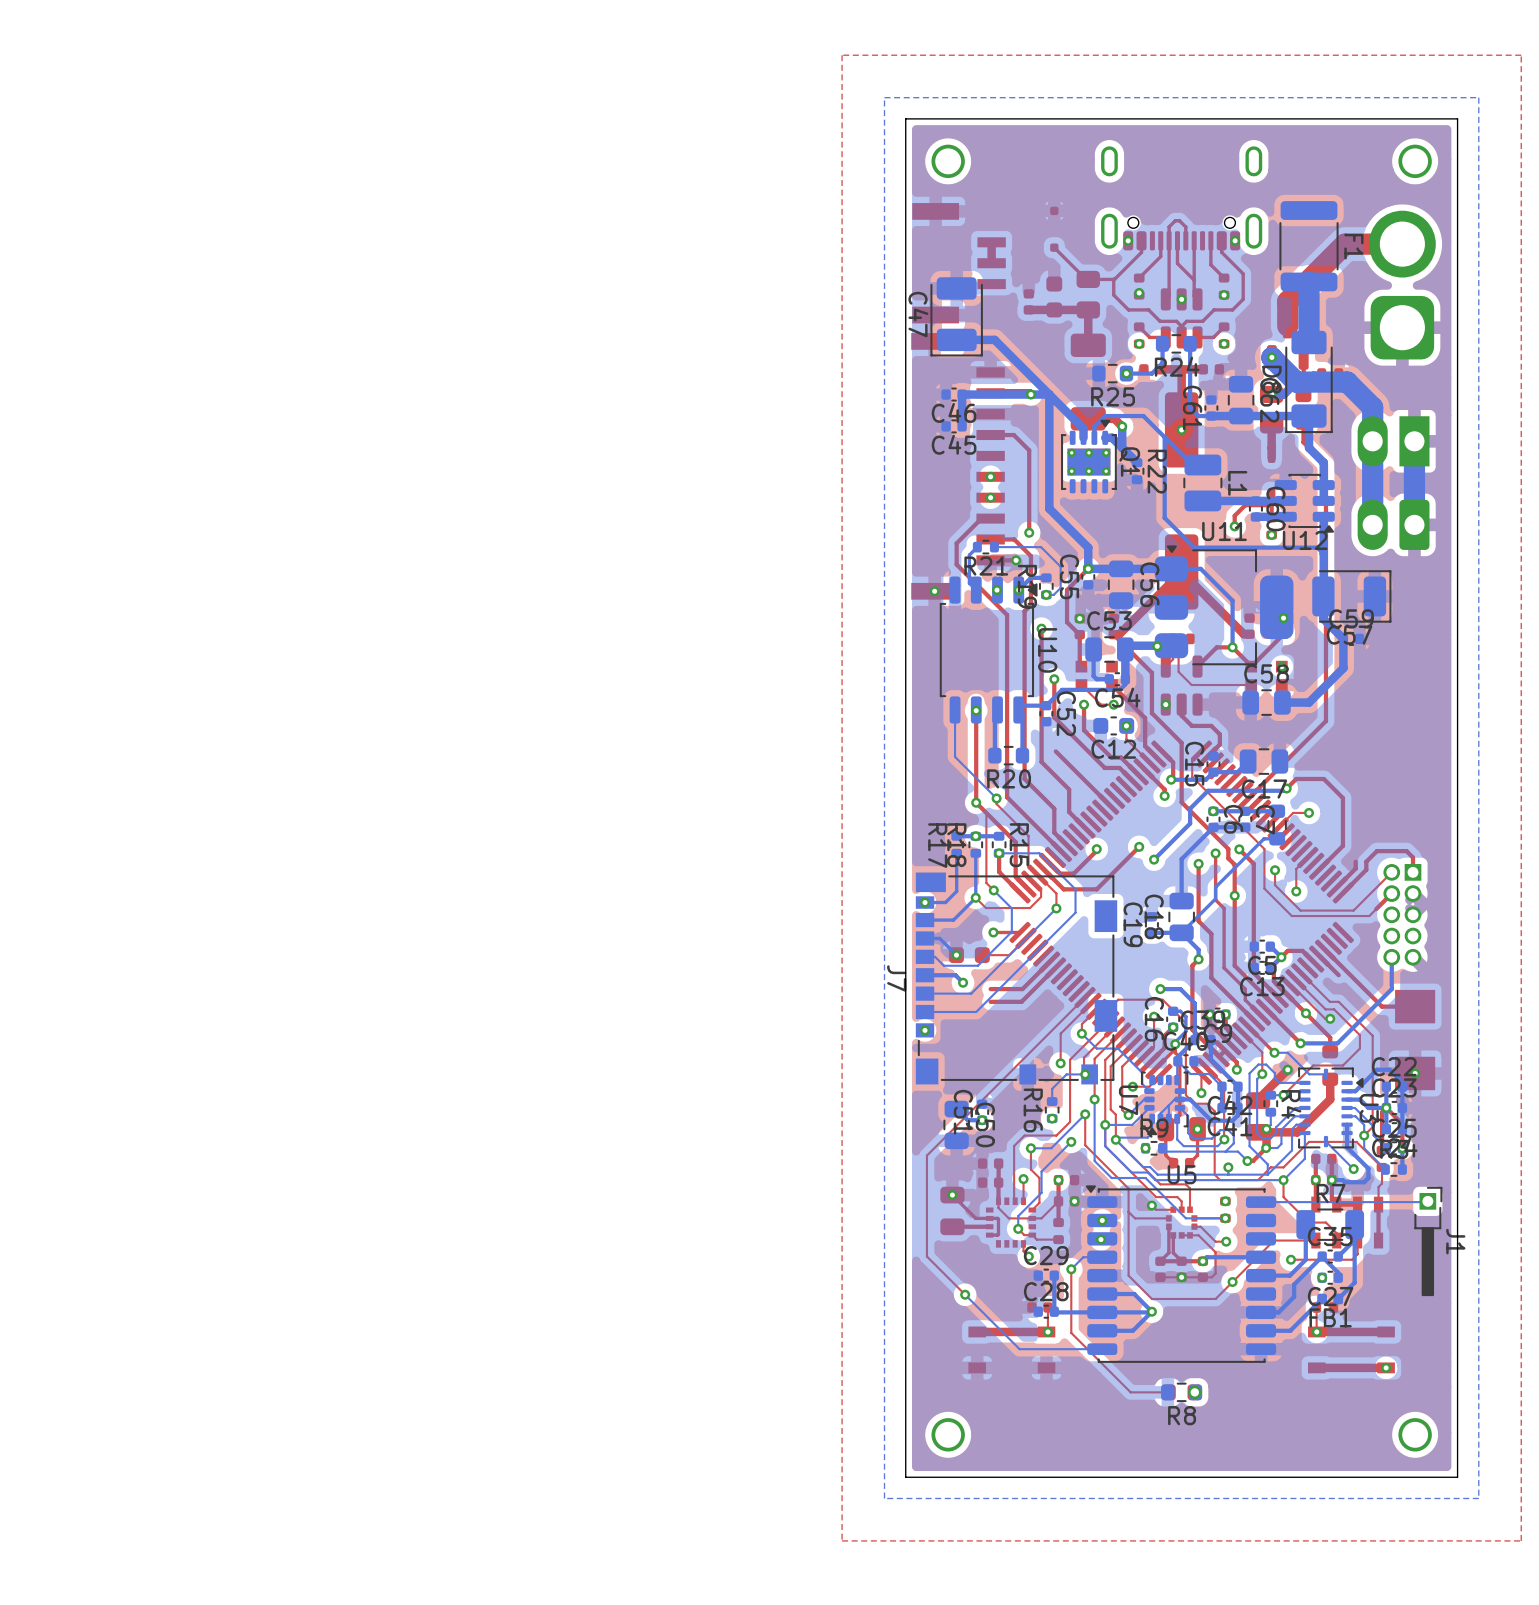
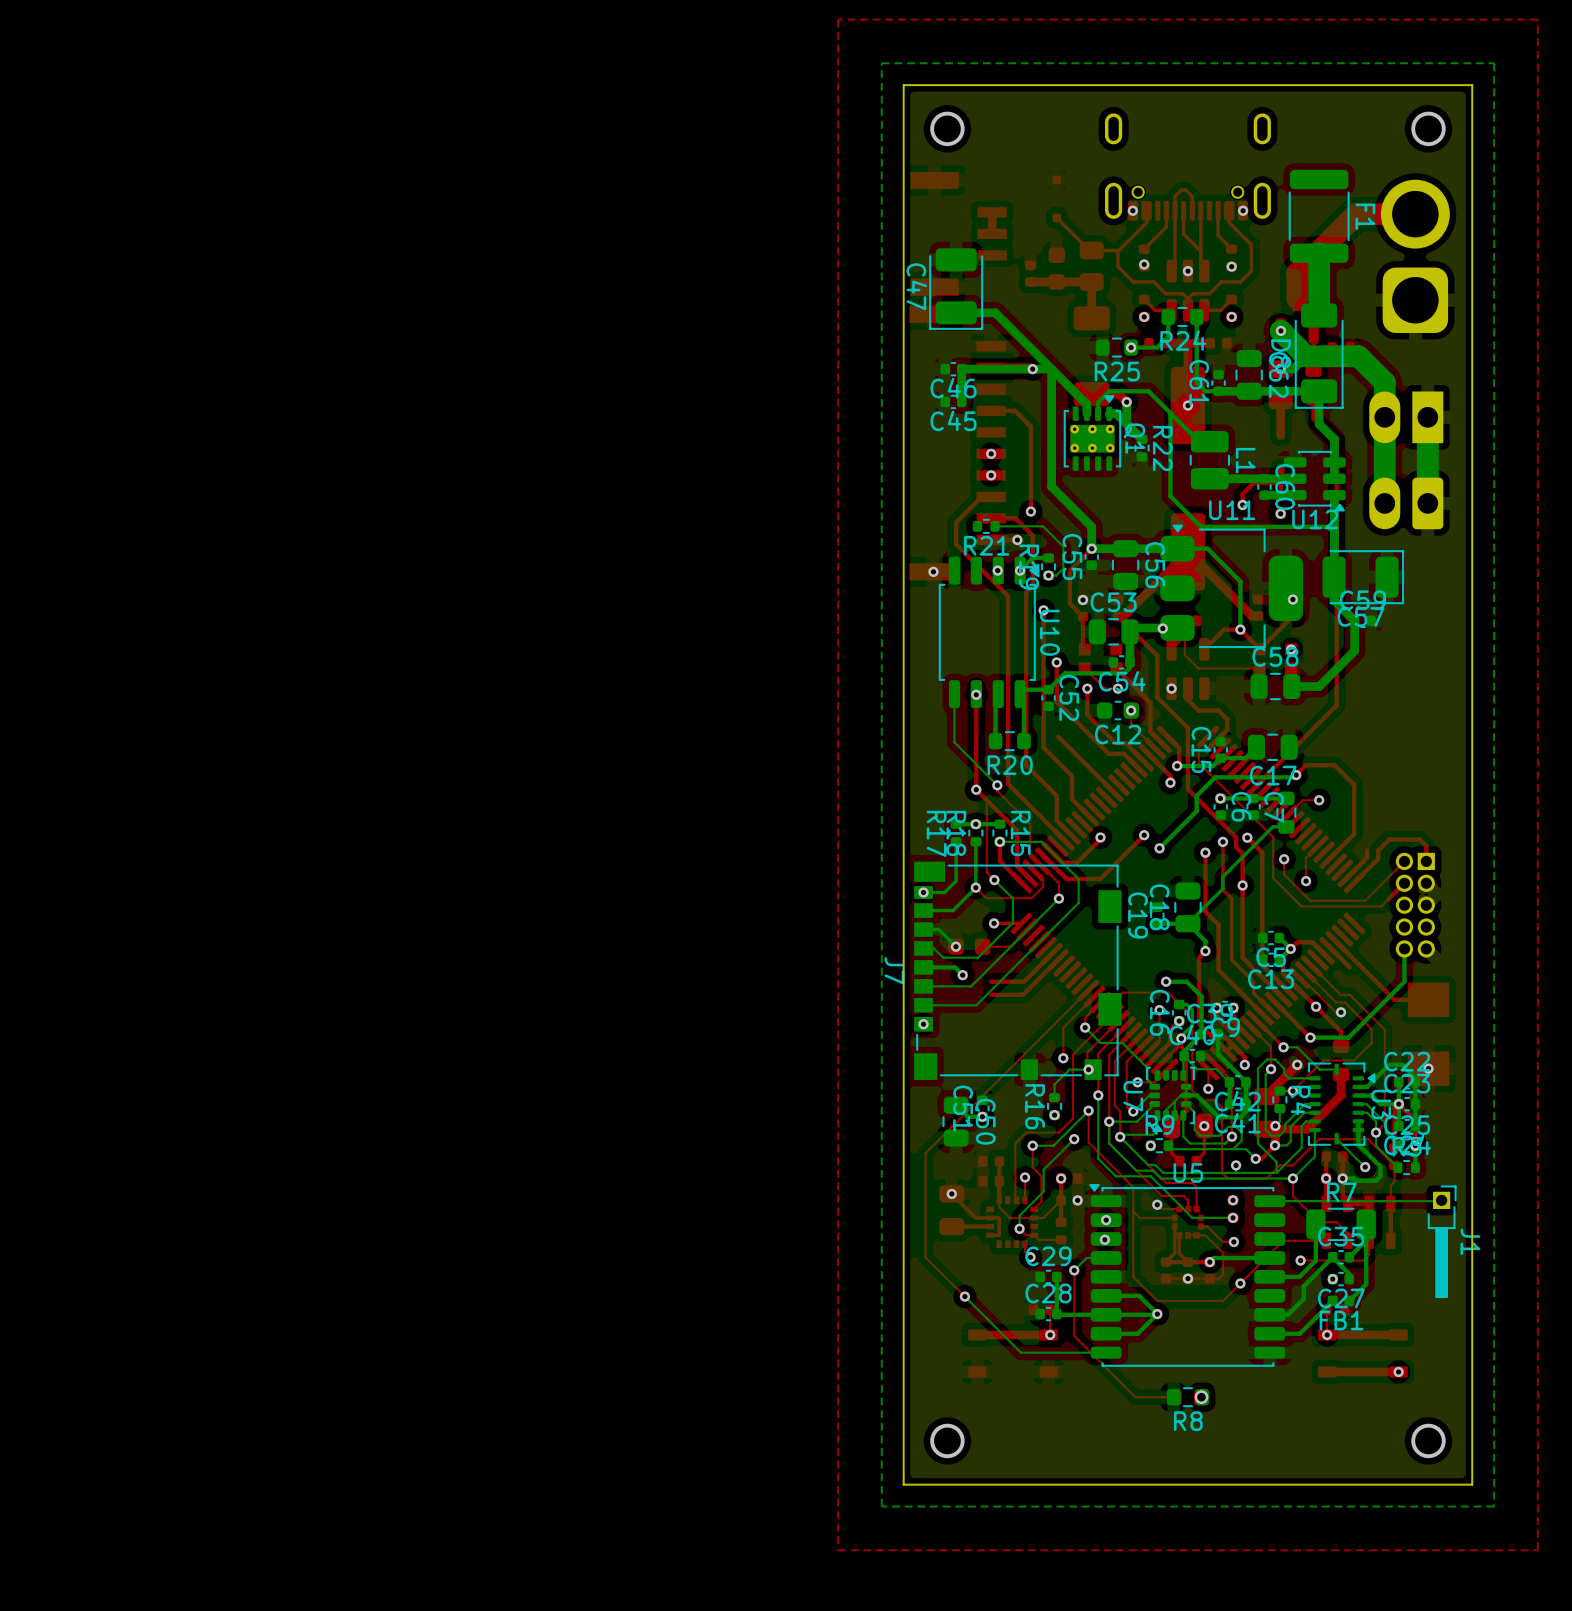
bottom track: (977, 547) (969, 555) (969, 583) (976, 590) -> none
bottom track: (1093, 649) (1093, 676) (1096, 679) (1109, 679) -> none
bottom track: (1245, 827) (1213, 827) (1181, 859) (1181, 901) -> none

